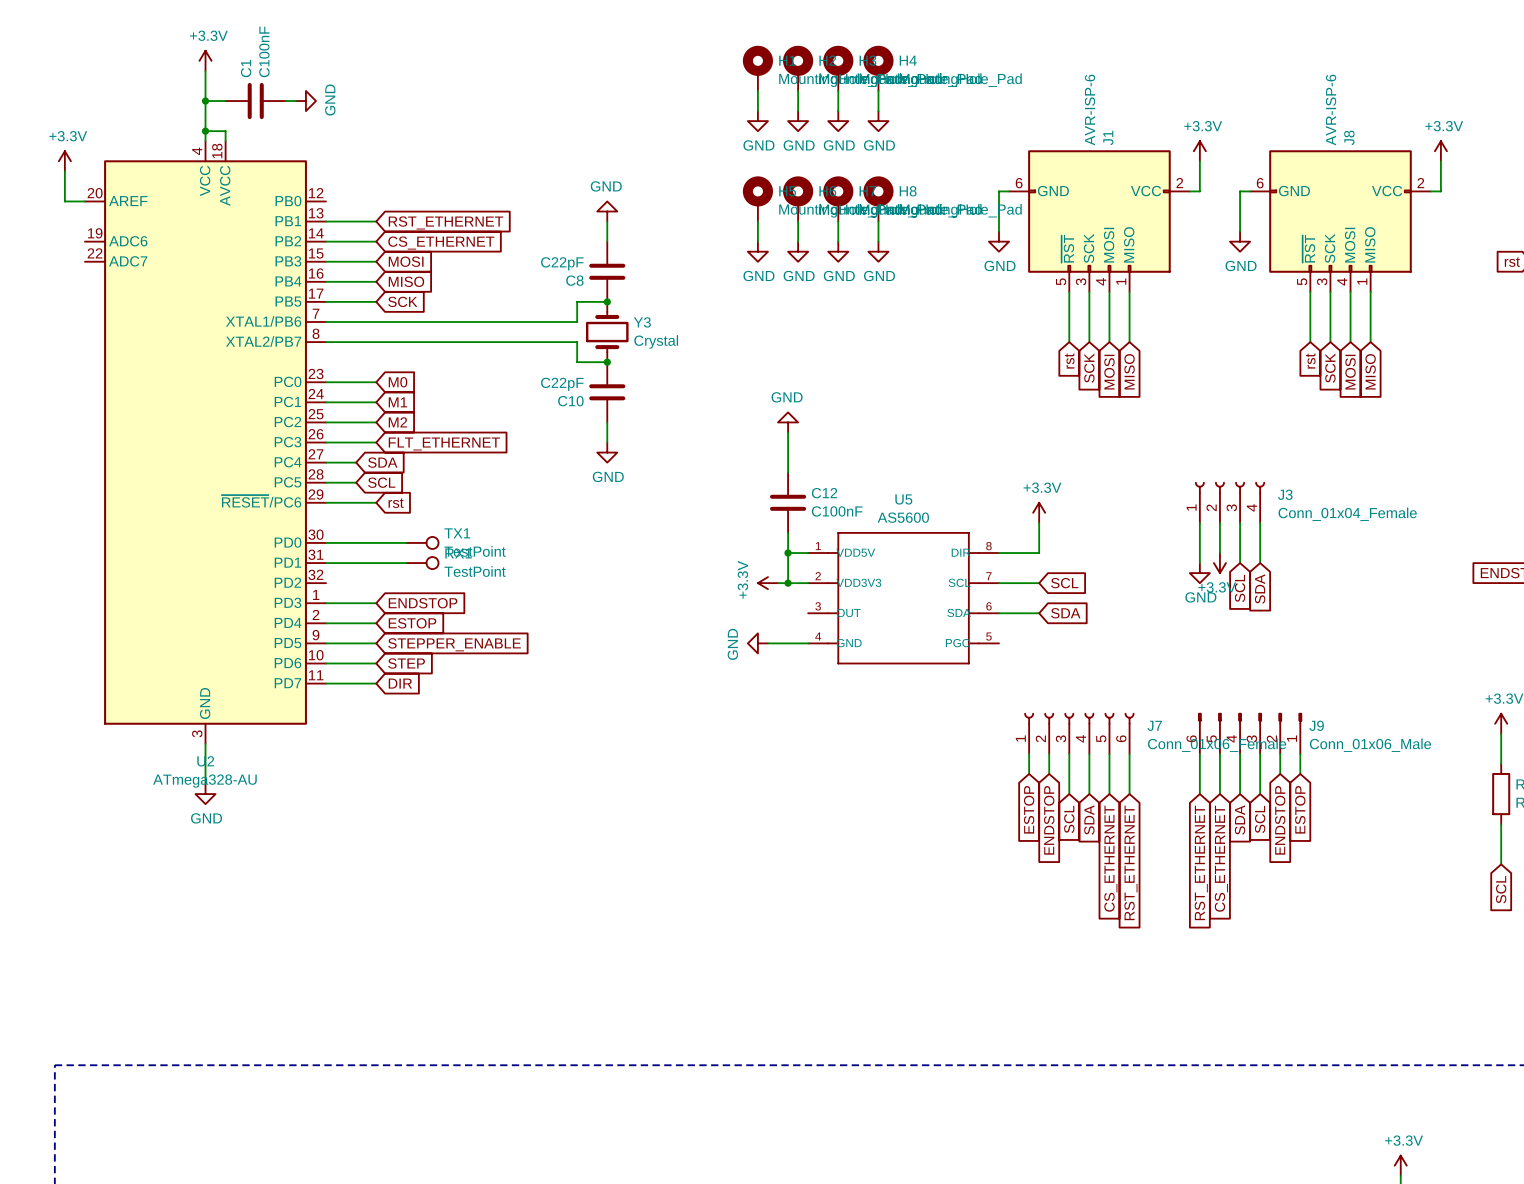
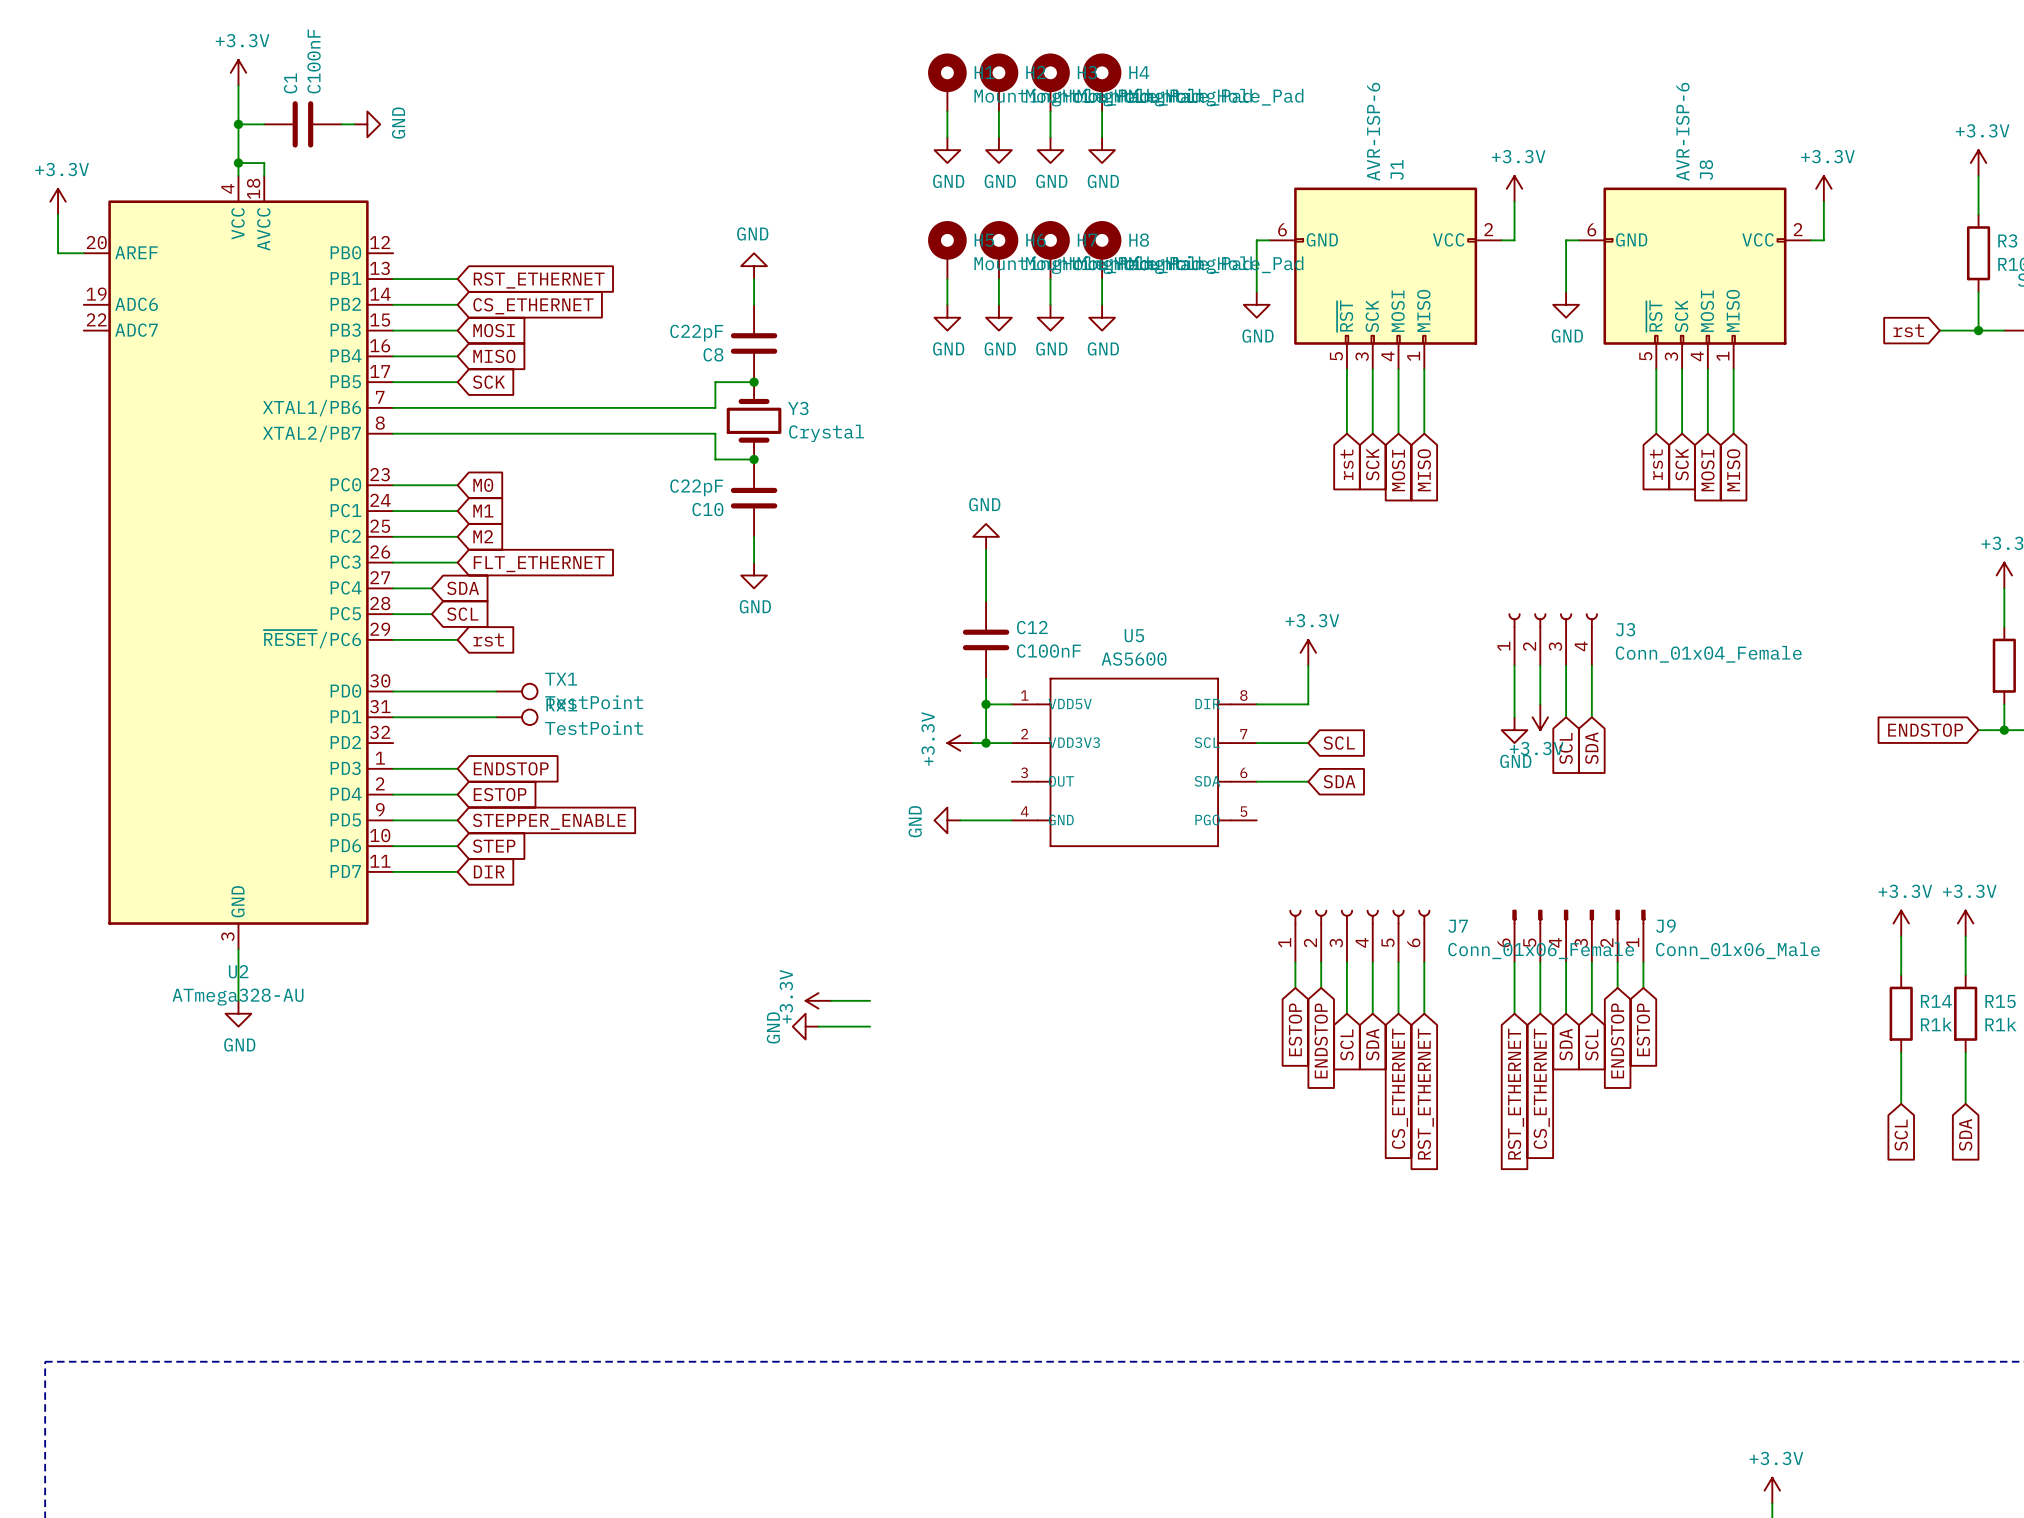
power symbol: none -> +3.3V (818, 1000)
wire: none -> (831, 1000) (870, 1000)
power symbol: none -> GND (805, 1026)
wire: none -> (818, 1026) (870, 1026)

